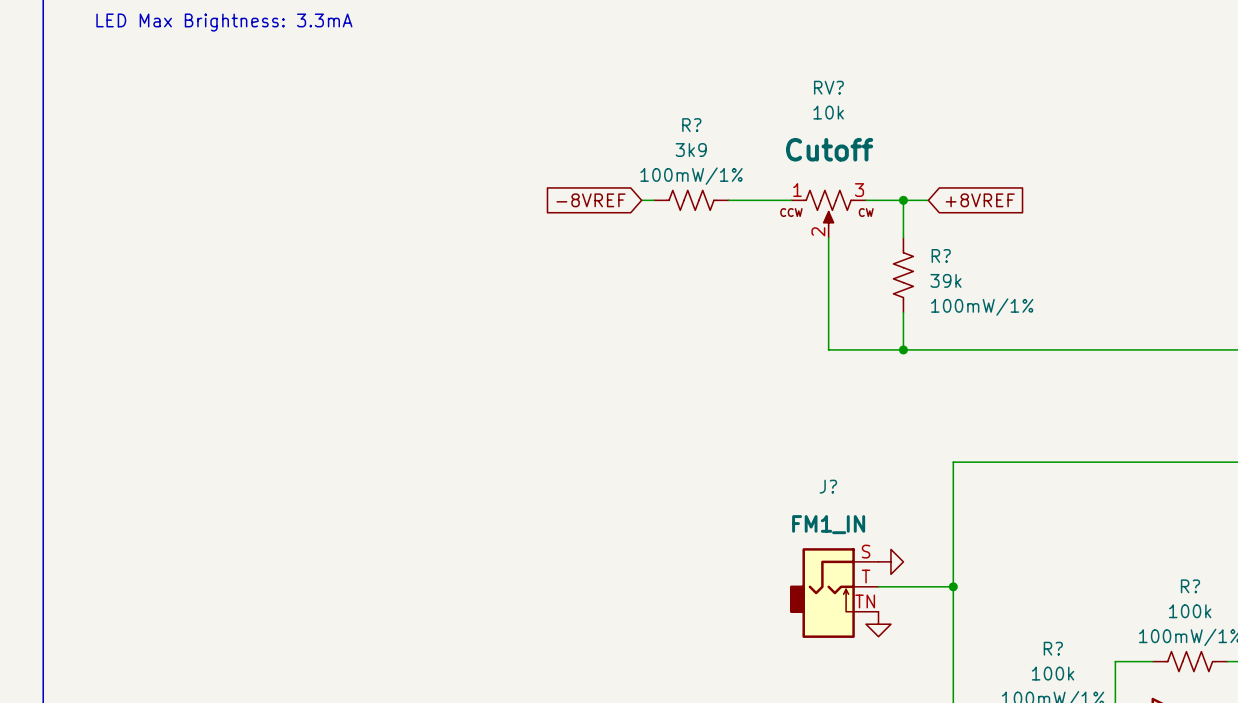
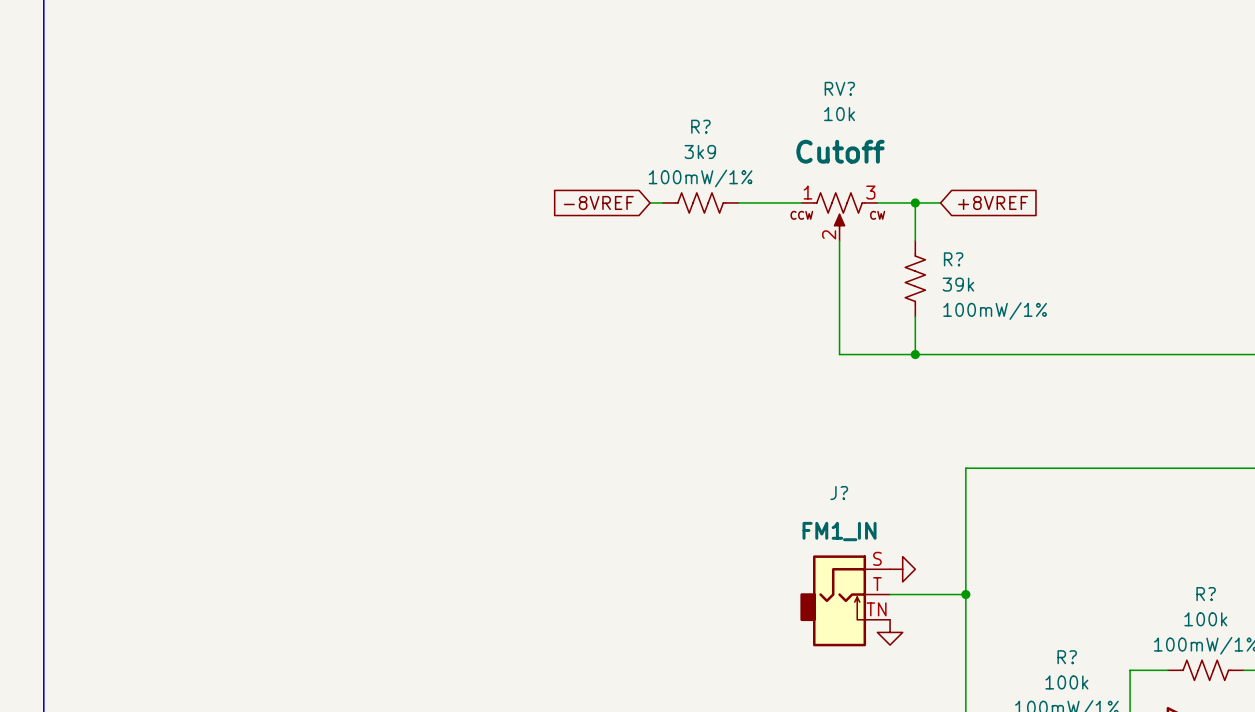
text: LED Max Brightness: 3.3mA (224, 22) -> none

